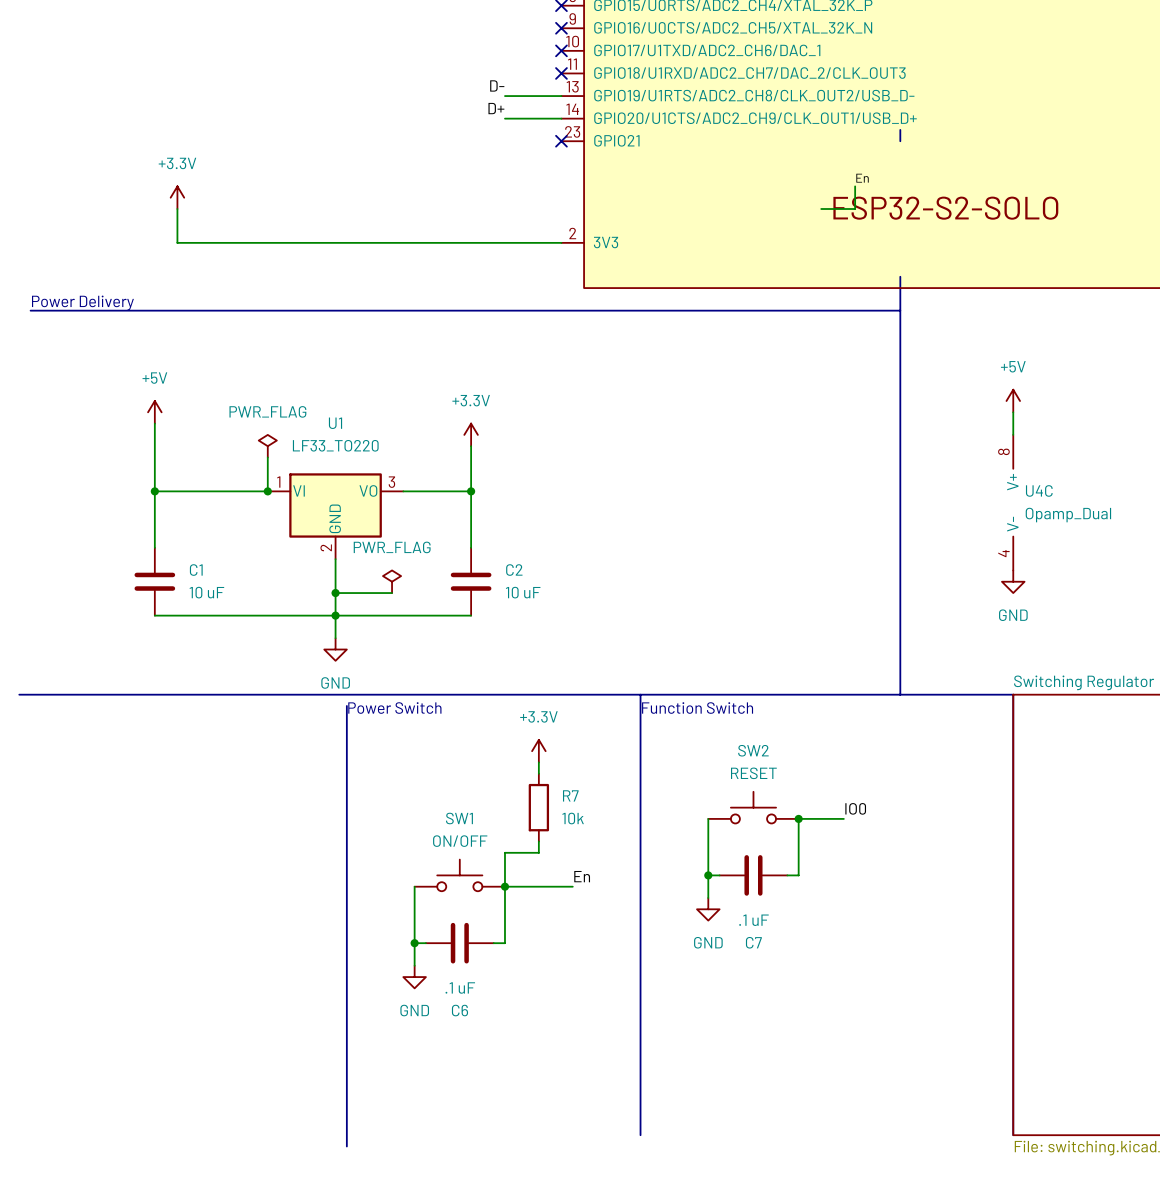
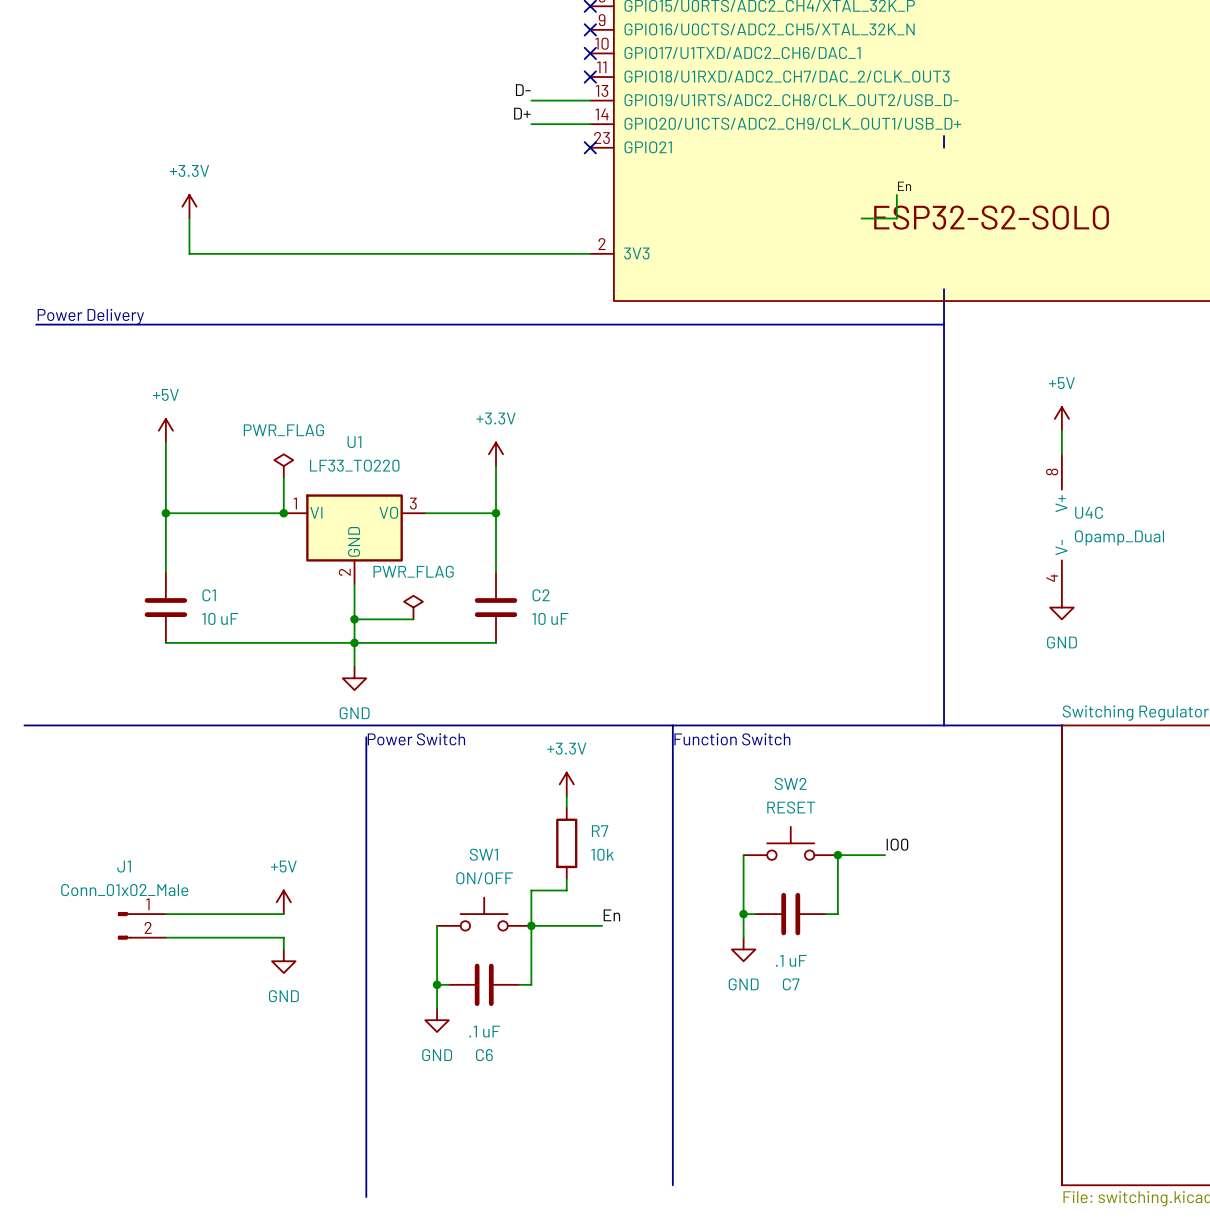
power symbol: none -> +5V (283, 902)
wire: none -> (165, 914) (283, 914)
J1: none -> Conn_01x02_Male (141, 925)
wire: none -> (165, 937) (283, 937) (283, 949)
power symbol: none -> GND (283, 961)

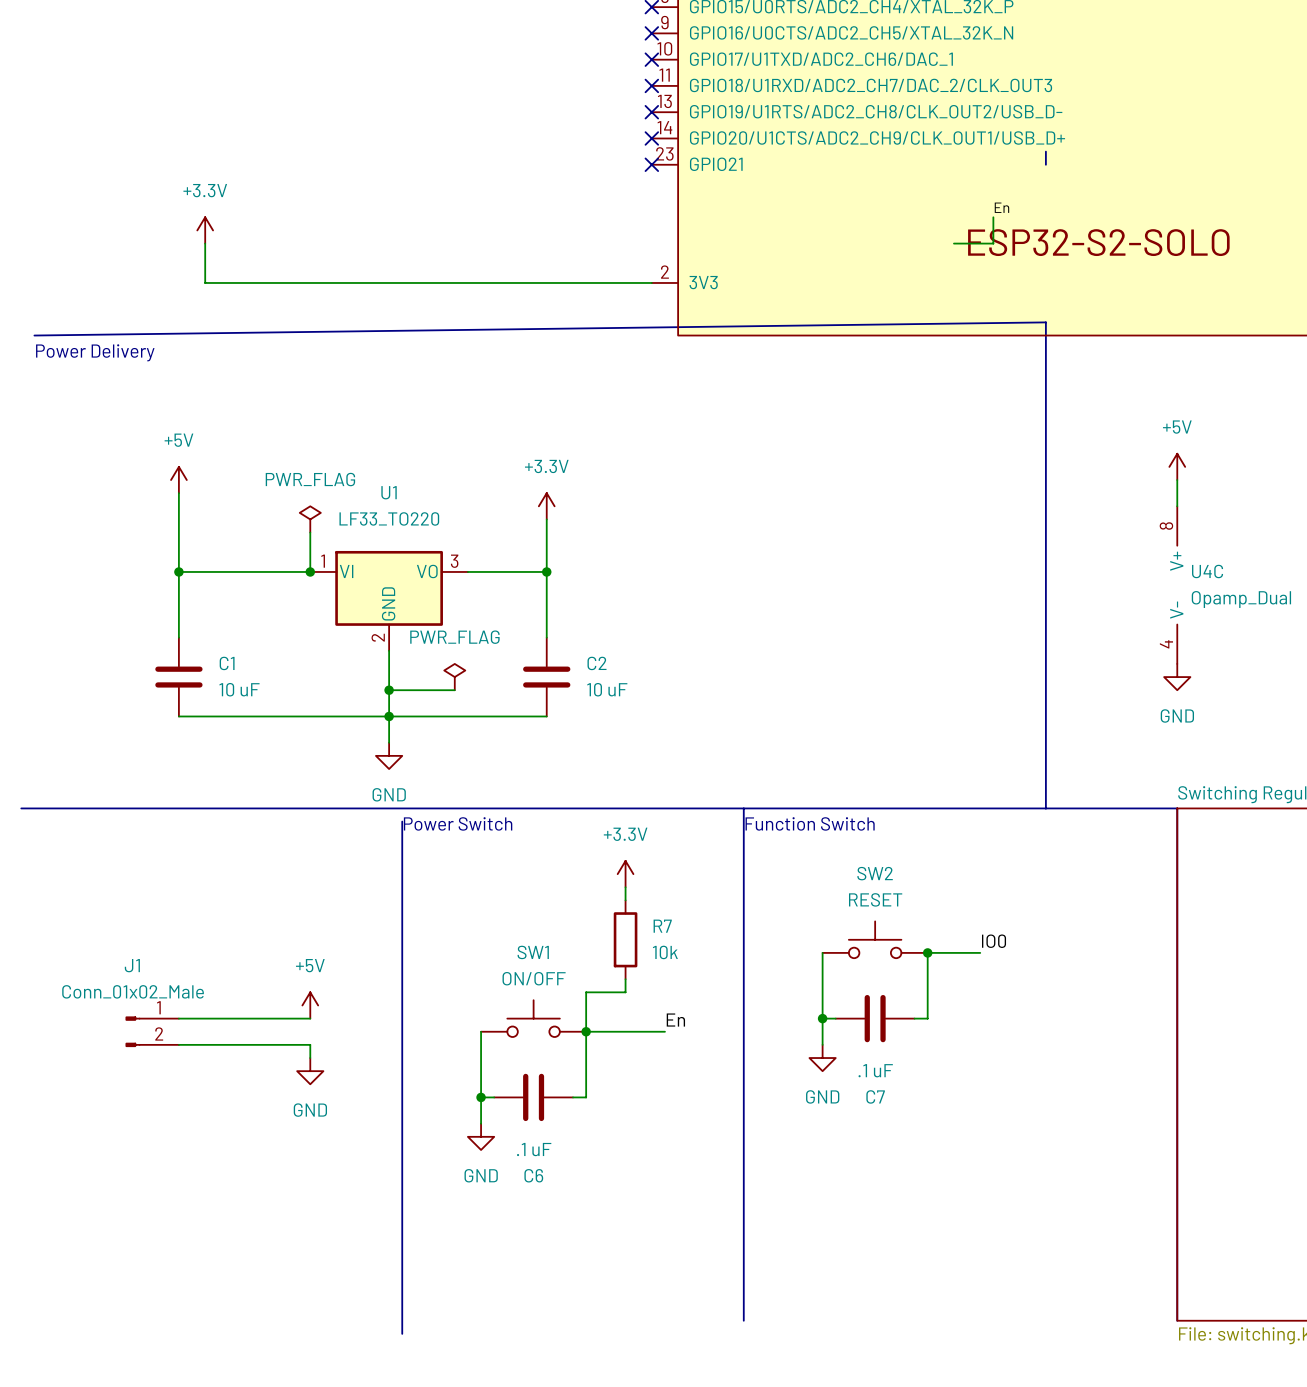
label: D- (523, 90) -> none
wire: (531, 100) (590, 100) -> none
no-connect mark: none -> (651, 112)
label: D+ (522, 113) -> none
wire: (531, 124) (590, 124) -> none
no-connect mark: none -> (651, 138)
line: none -> (1045, 322) (34, 335)
line: (36, 324) (944, 324) -> none

